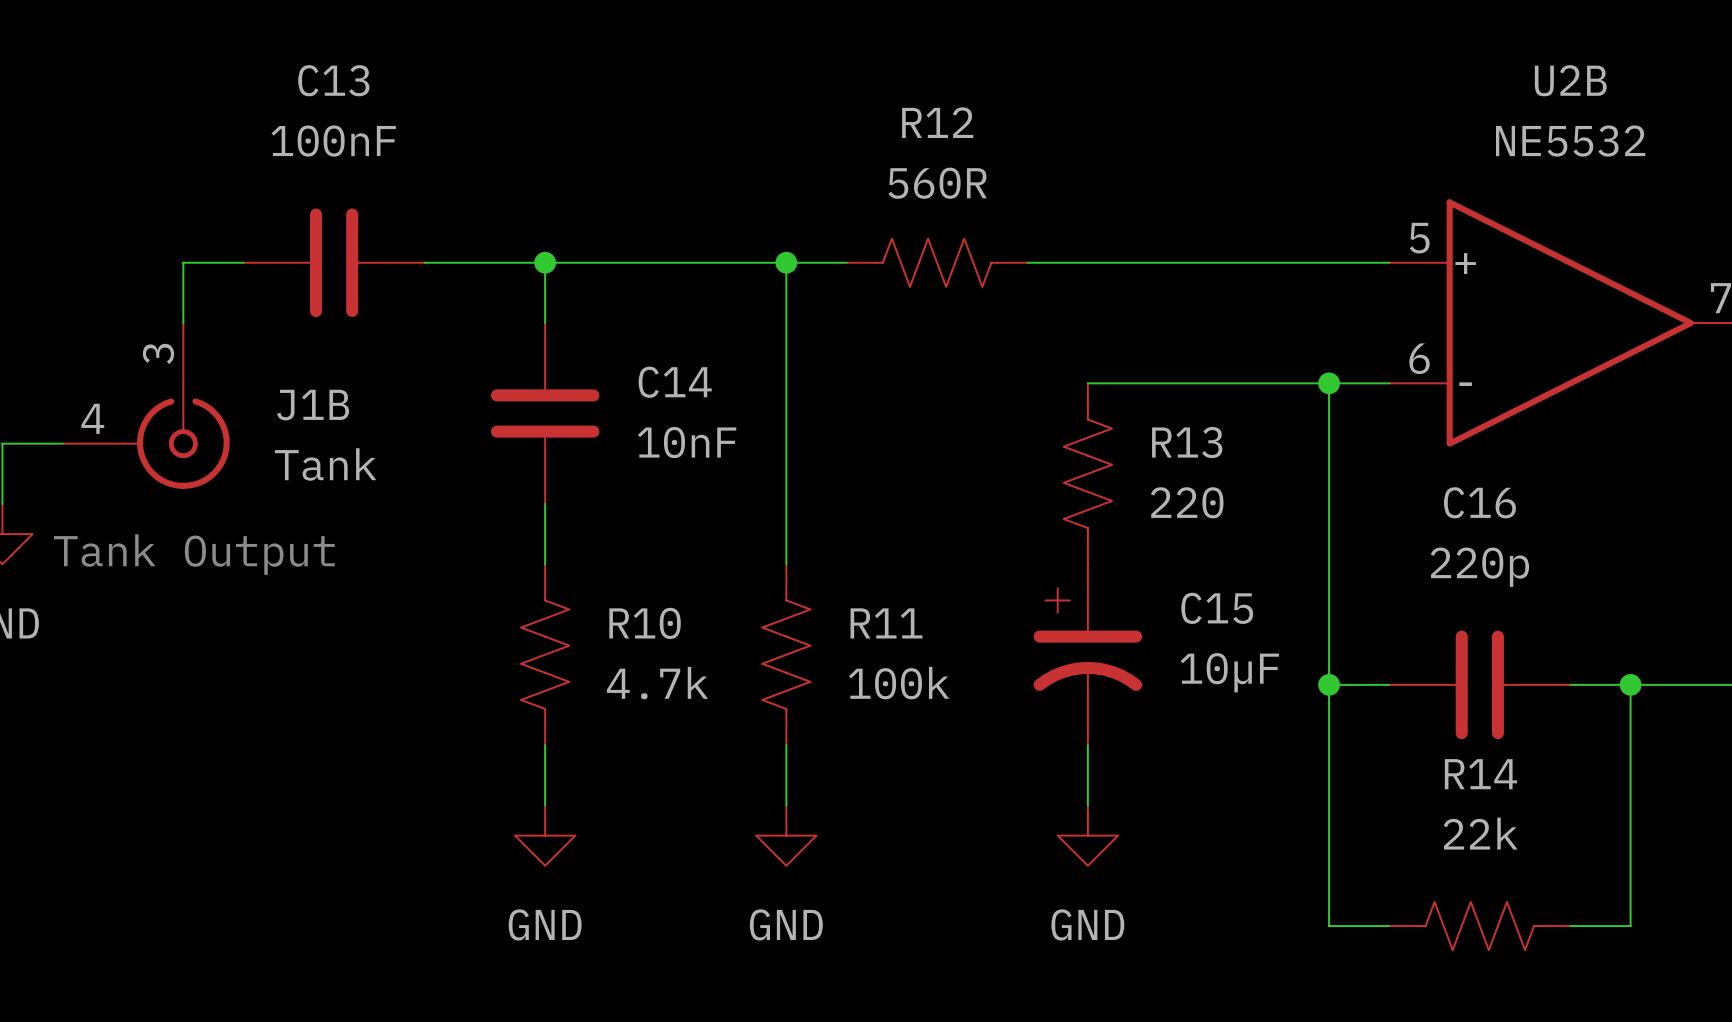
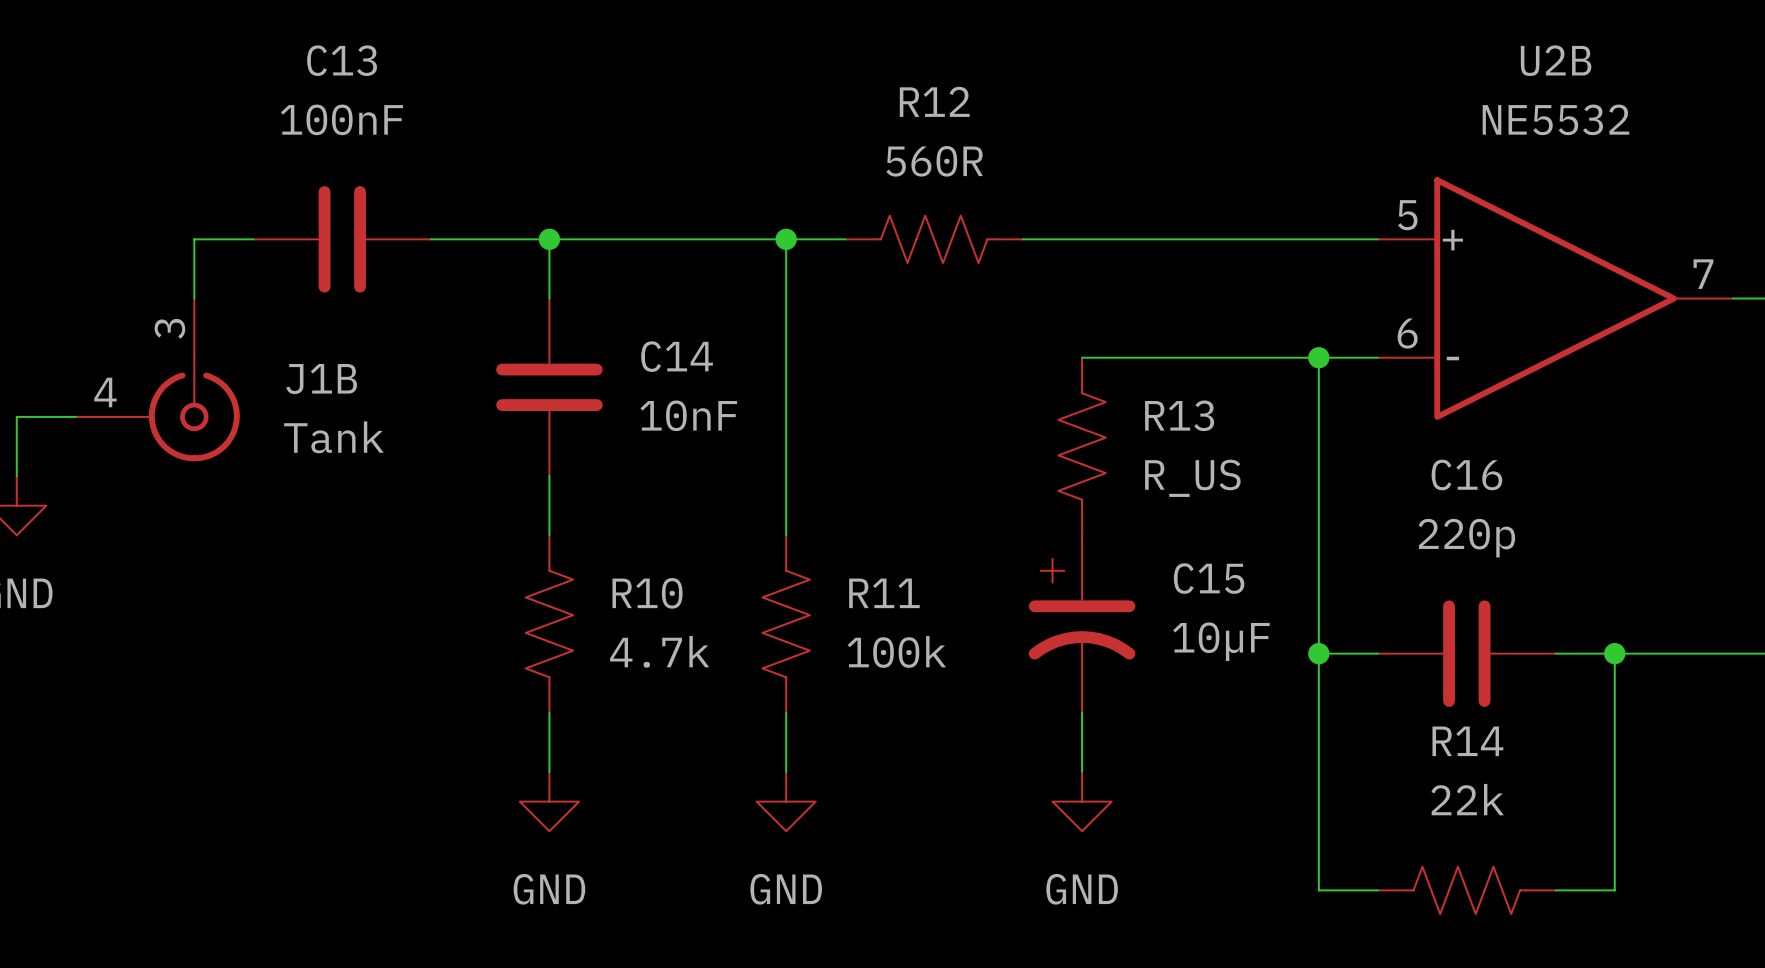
R13 value: 220 (1187, 502) -> R_US (1192, 478)
text: Tank Output (194, 554) -> none

